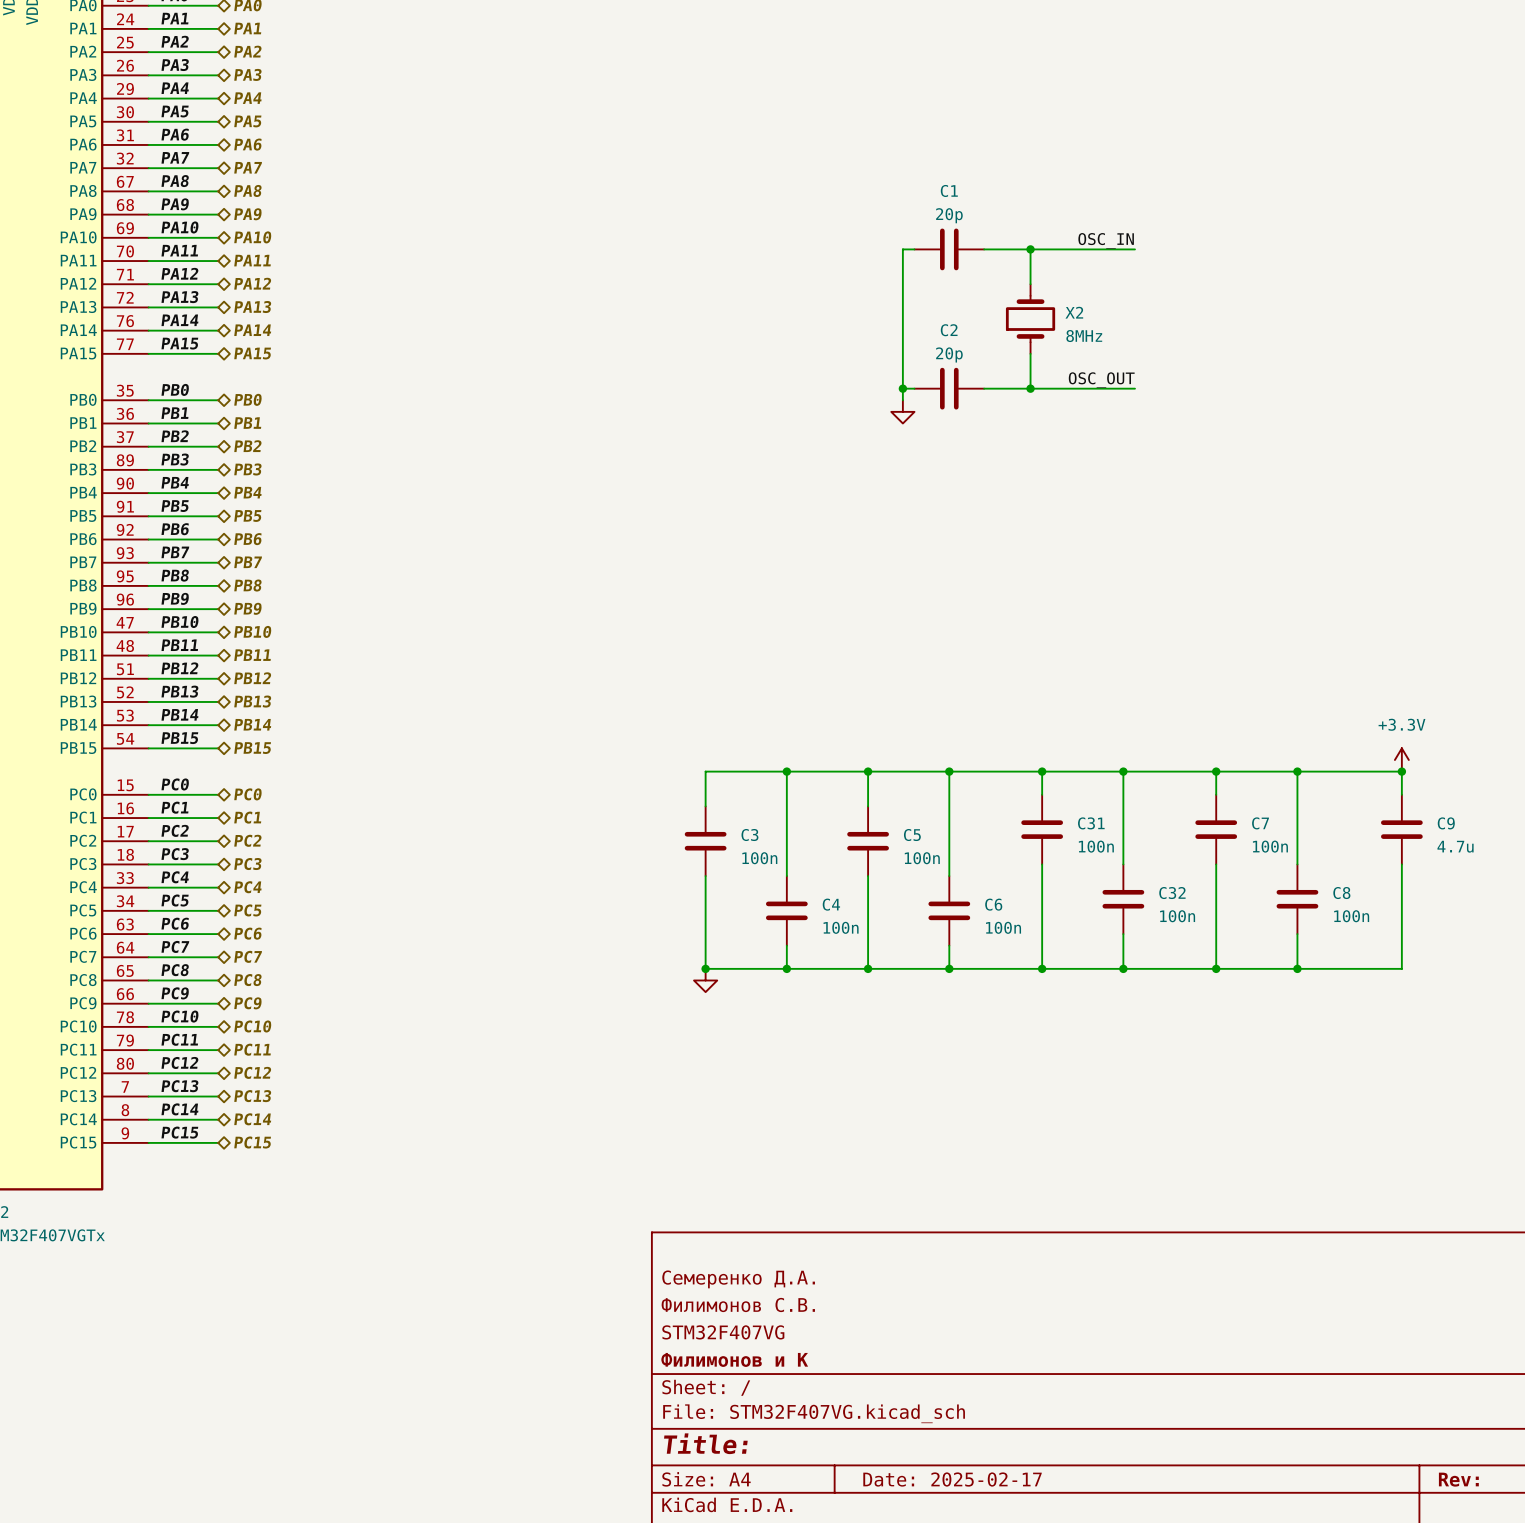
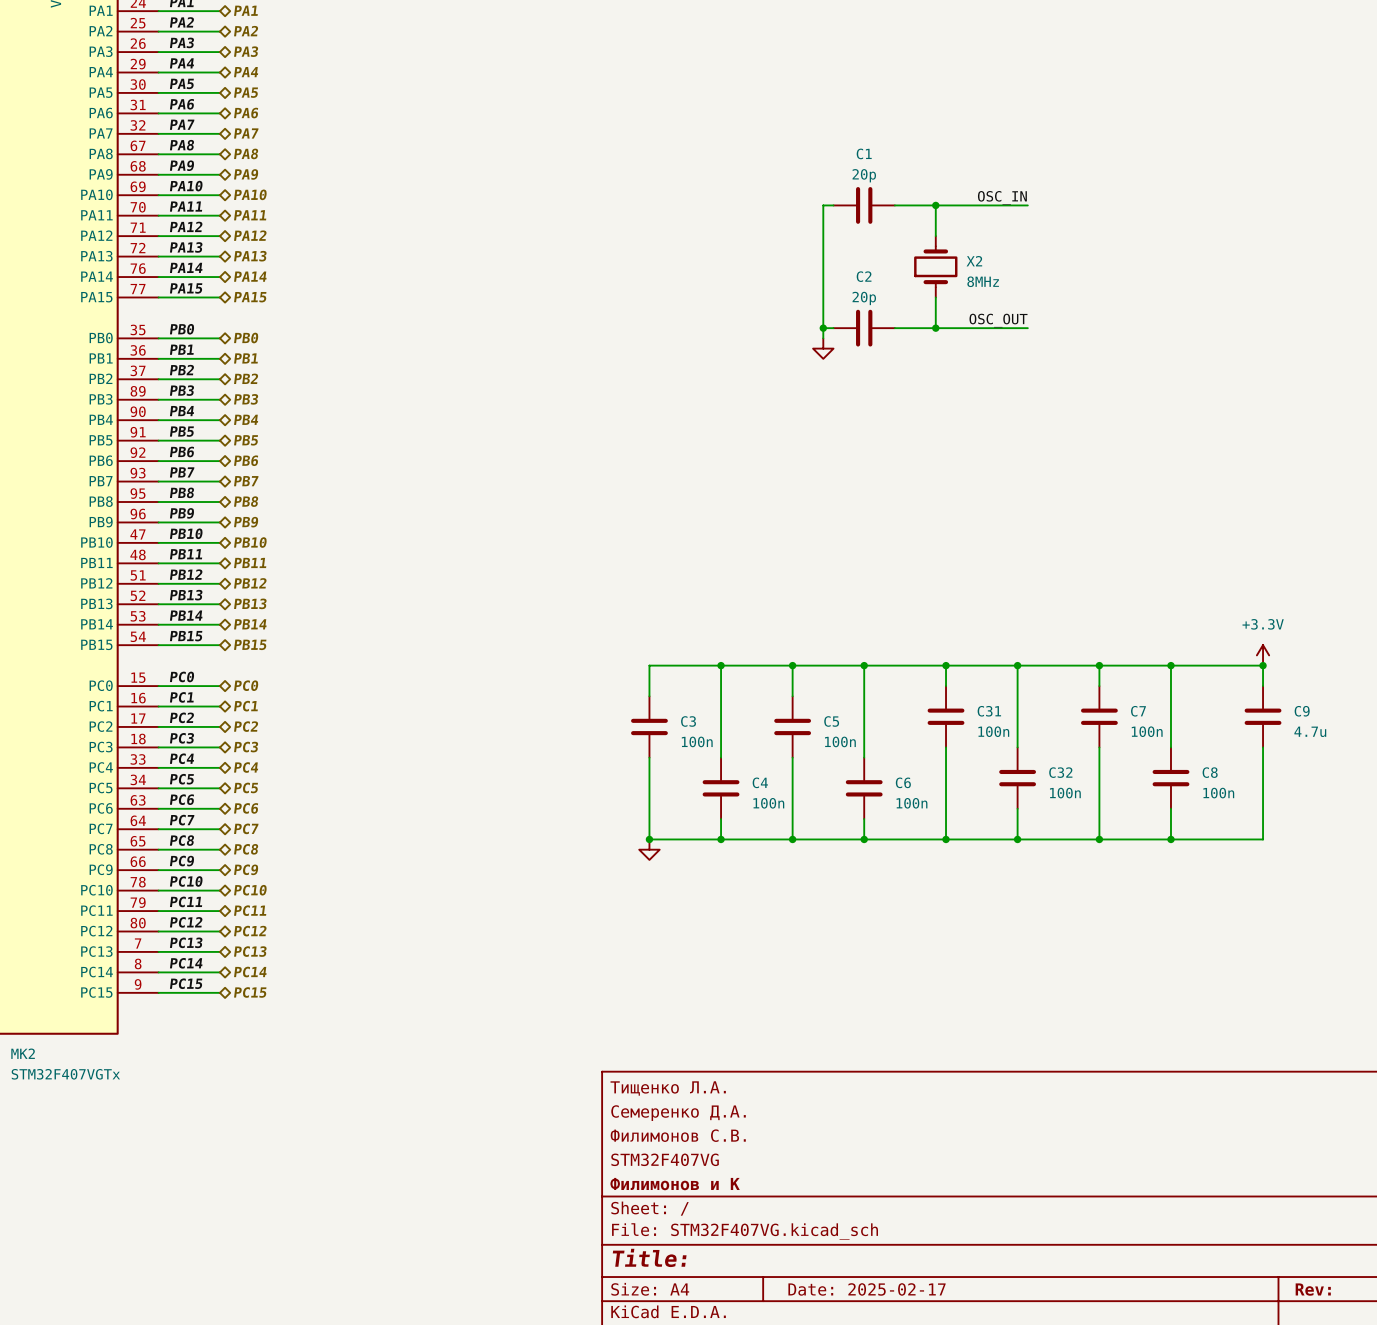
title block: none -> Тищенко Л.А. (668, 1088)

